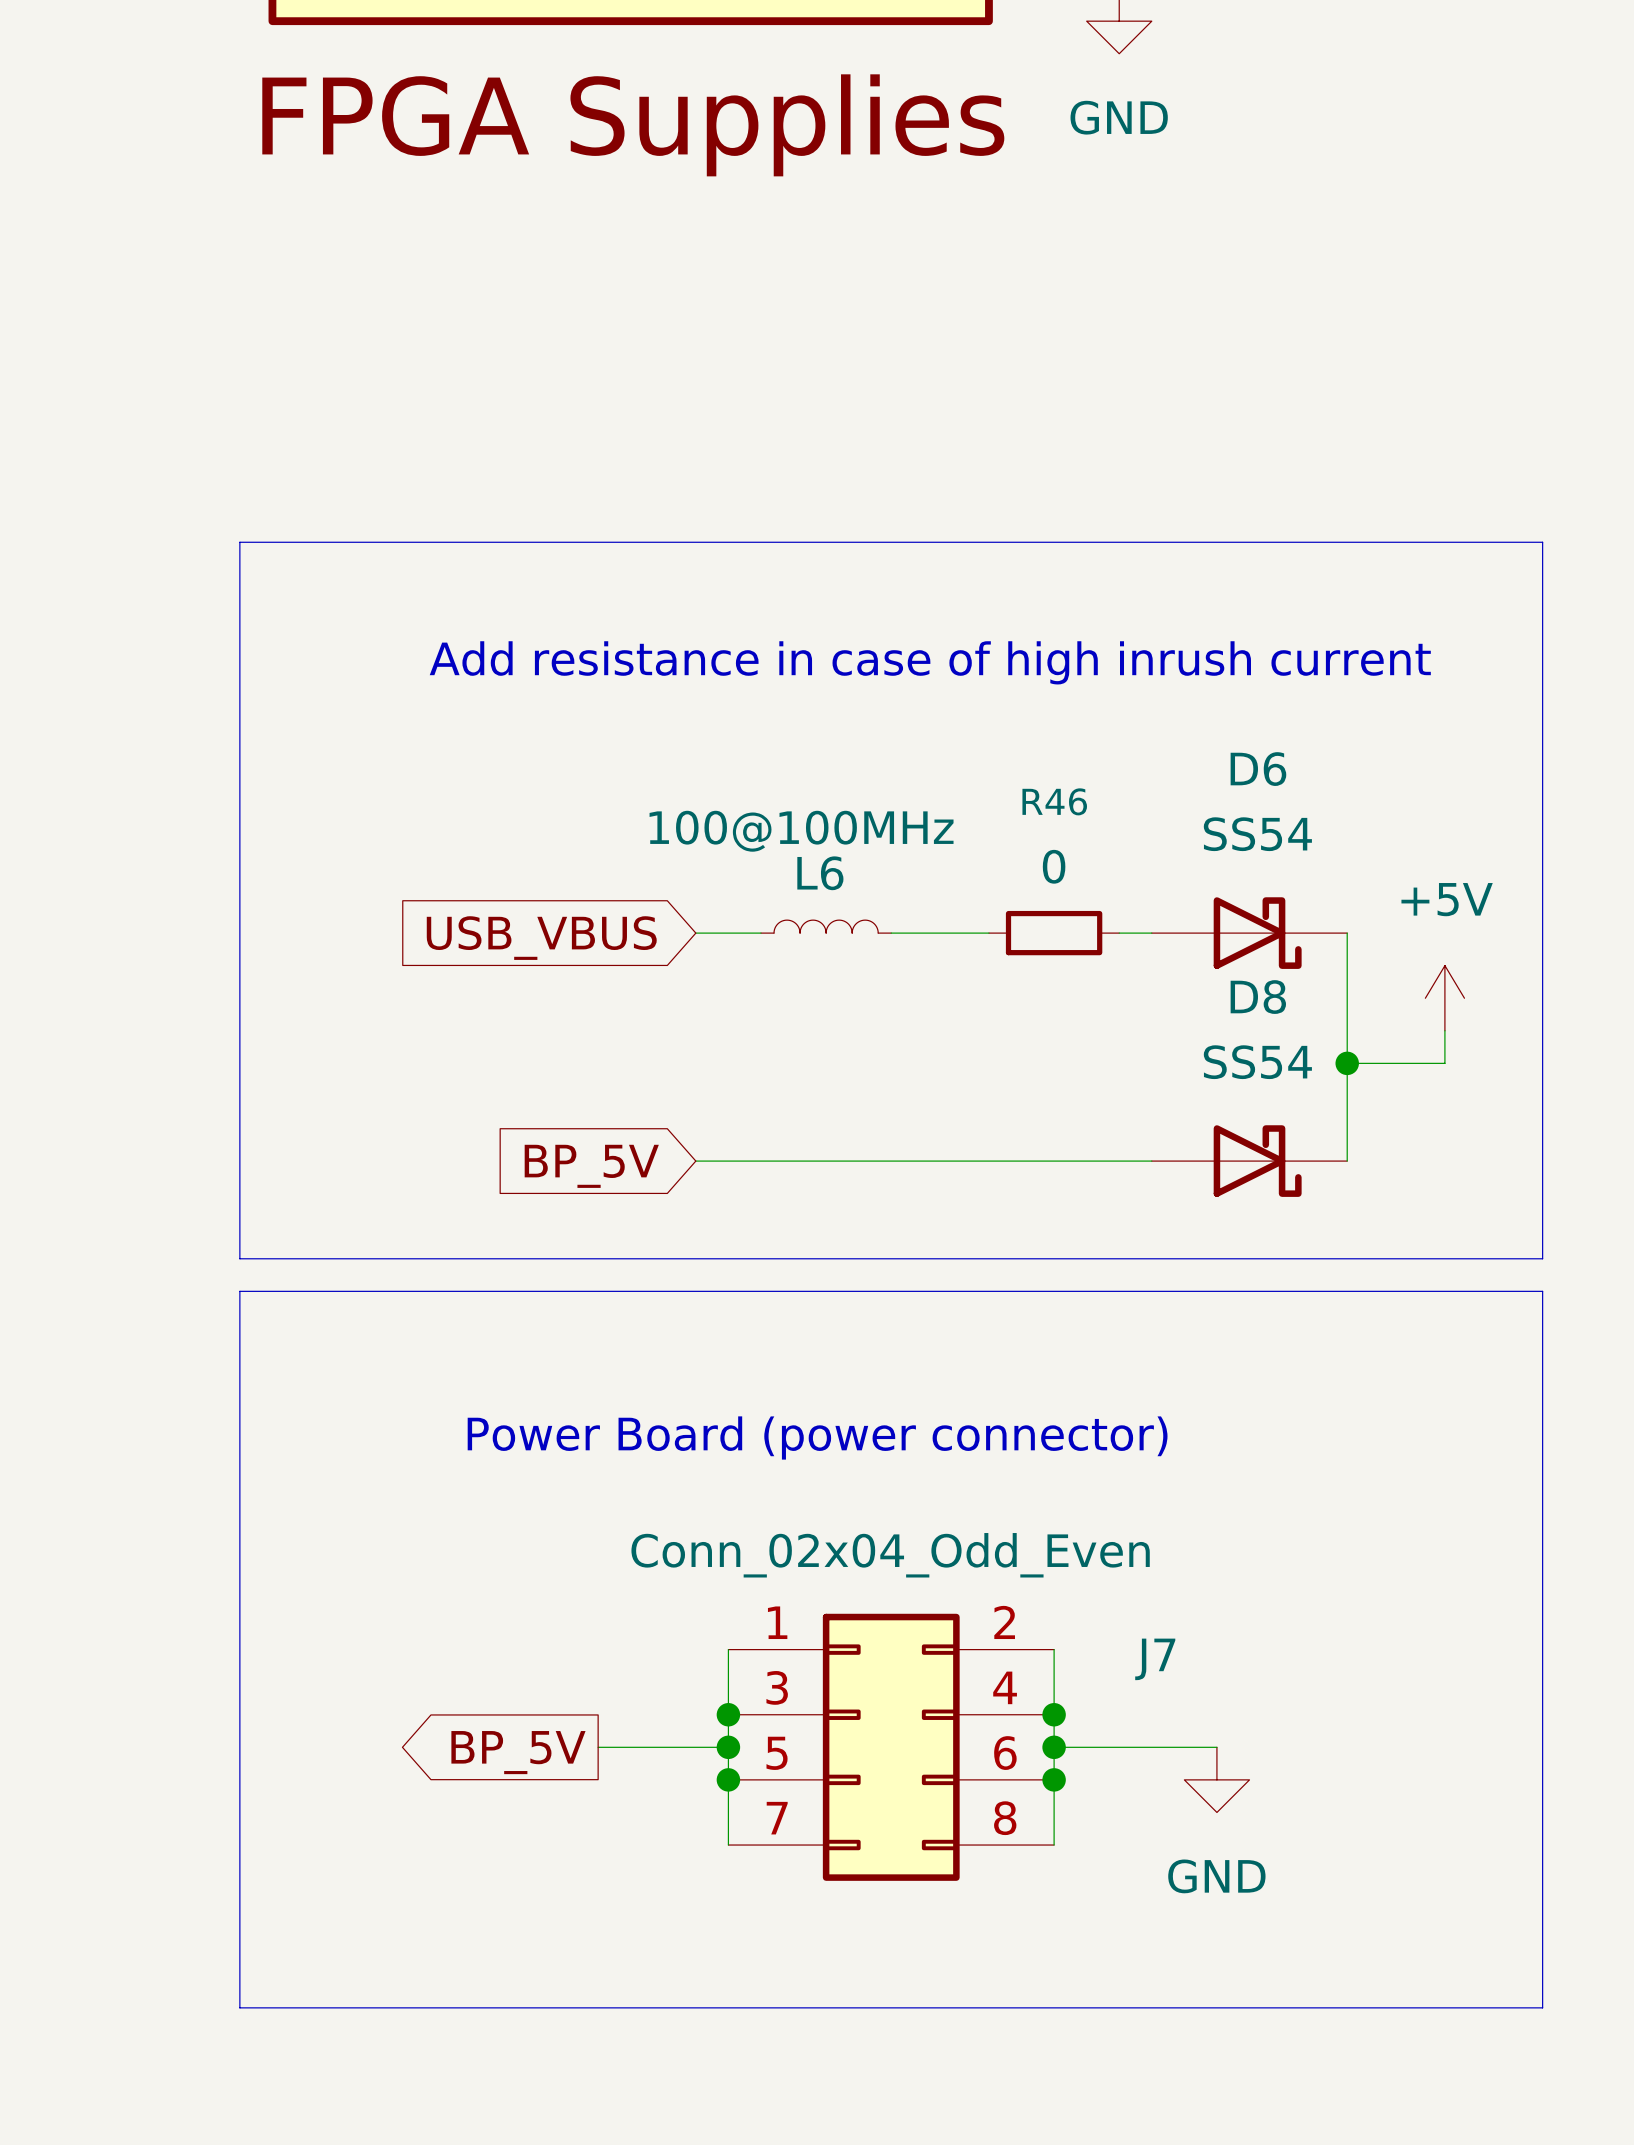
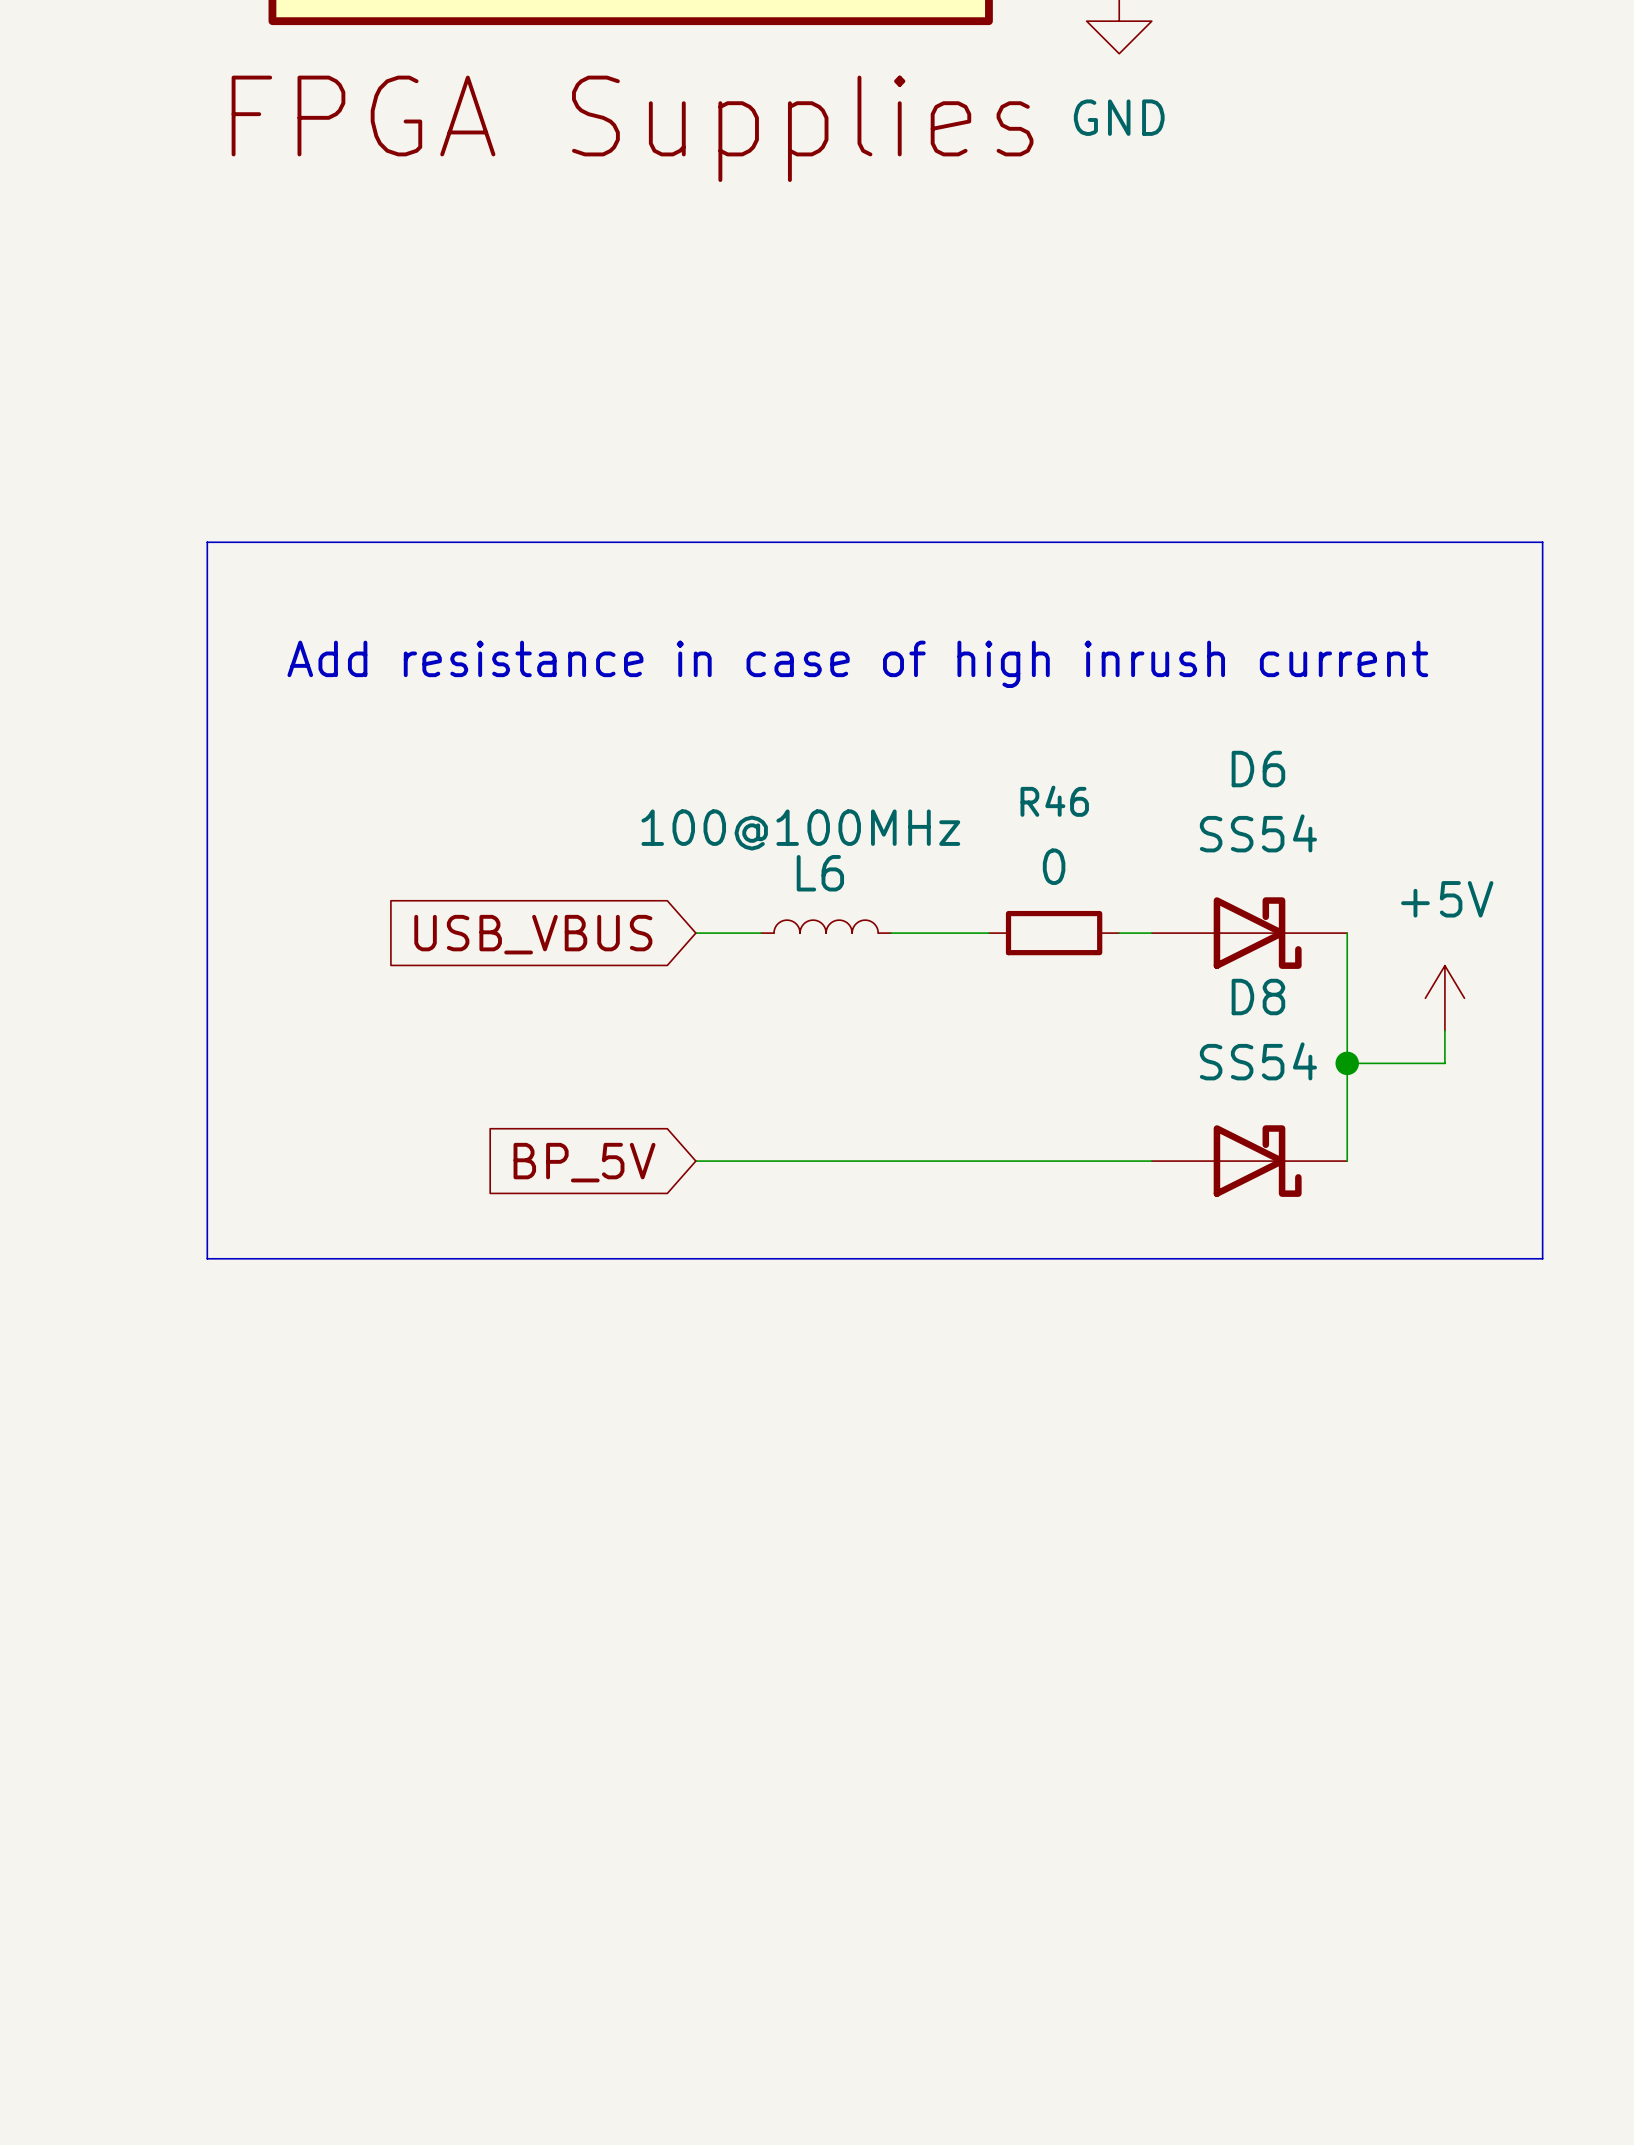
line: (239, 542) (239, 1258) -> (239, 542) (207, 542) (207, 1258) (239, 1258)
line: (239, 1291) (239, 2007) (1542, 2007) (1542, 1291) (239, 1291) -> none
text: Power Board (power connector) (817, 1437) -> none
wire: (728, 1649) (728, 1845) -> none
wire: (1054, 1649) (1054, 1845) -> none
junction: (728, 1714) -> none
junction: (1054, 1714) -> none
wire: (598, 1747) (728, 1747) -> none
junction: (728, 1747) -> none
J7: Conn_02x04_Odd_Even (891, 1747) -> none
wire: (1054, 1747) (1216, 1747) -> none
junction: (1054, 1747) -> none
global label: BP_5V (518, 1752) -> none
junction: (728, 1779) -> none
junction: (1054, 1779) -> none
power symbol: GND (1216, 1779) -> none

